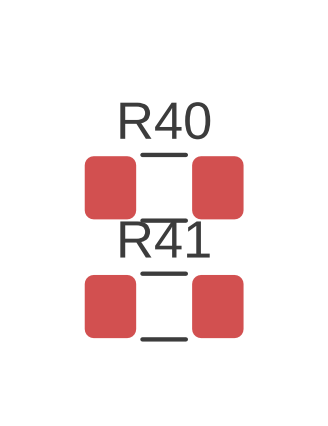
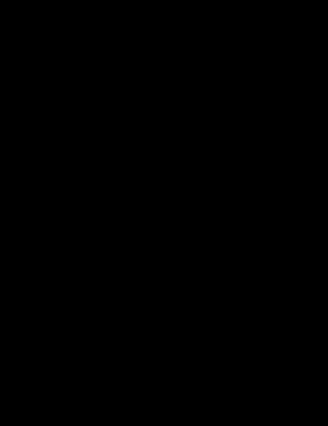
R40: (164, 187) -> none
R41: (164, 306) -> none

